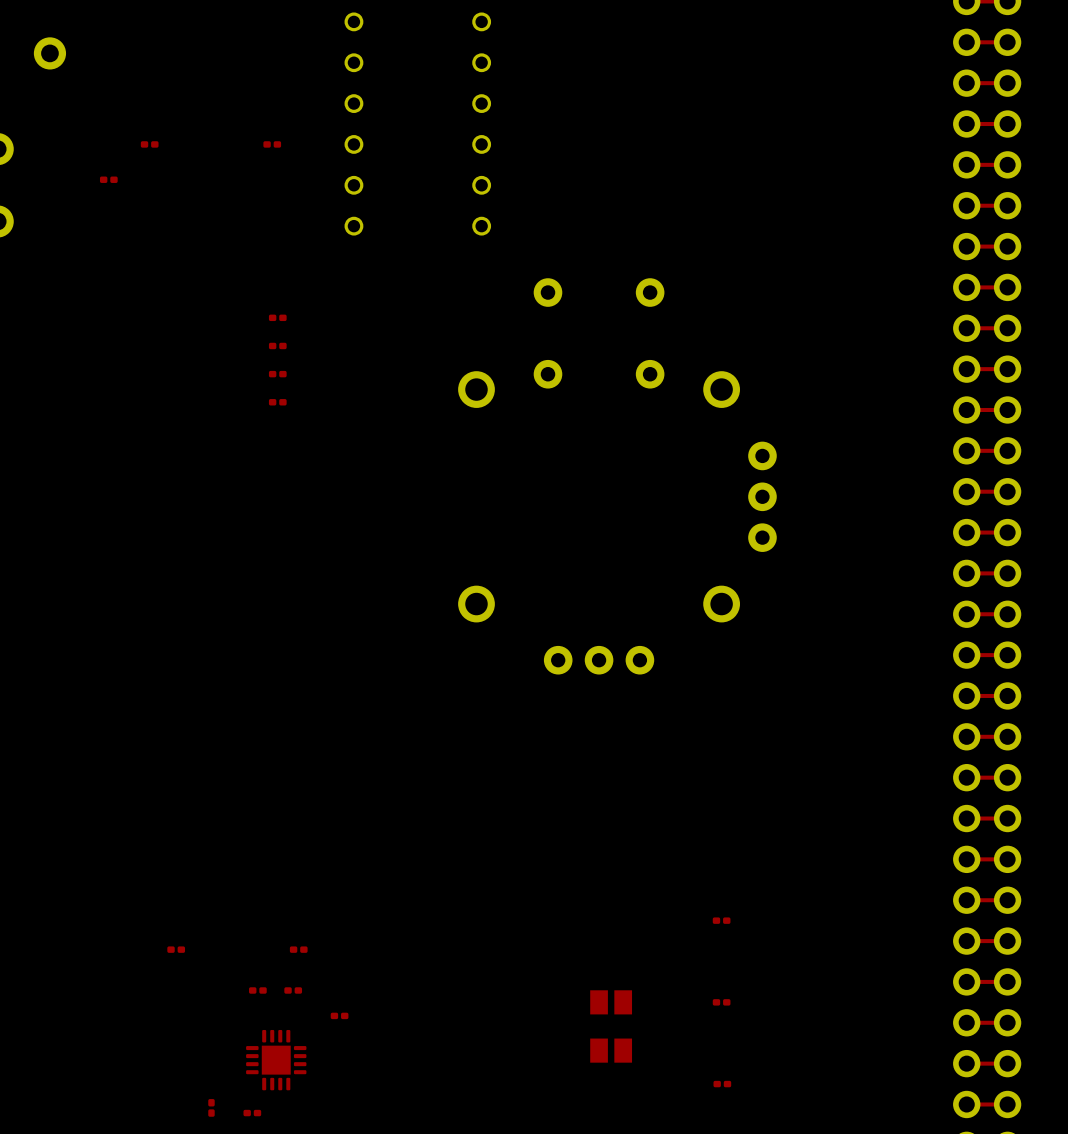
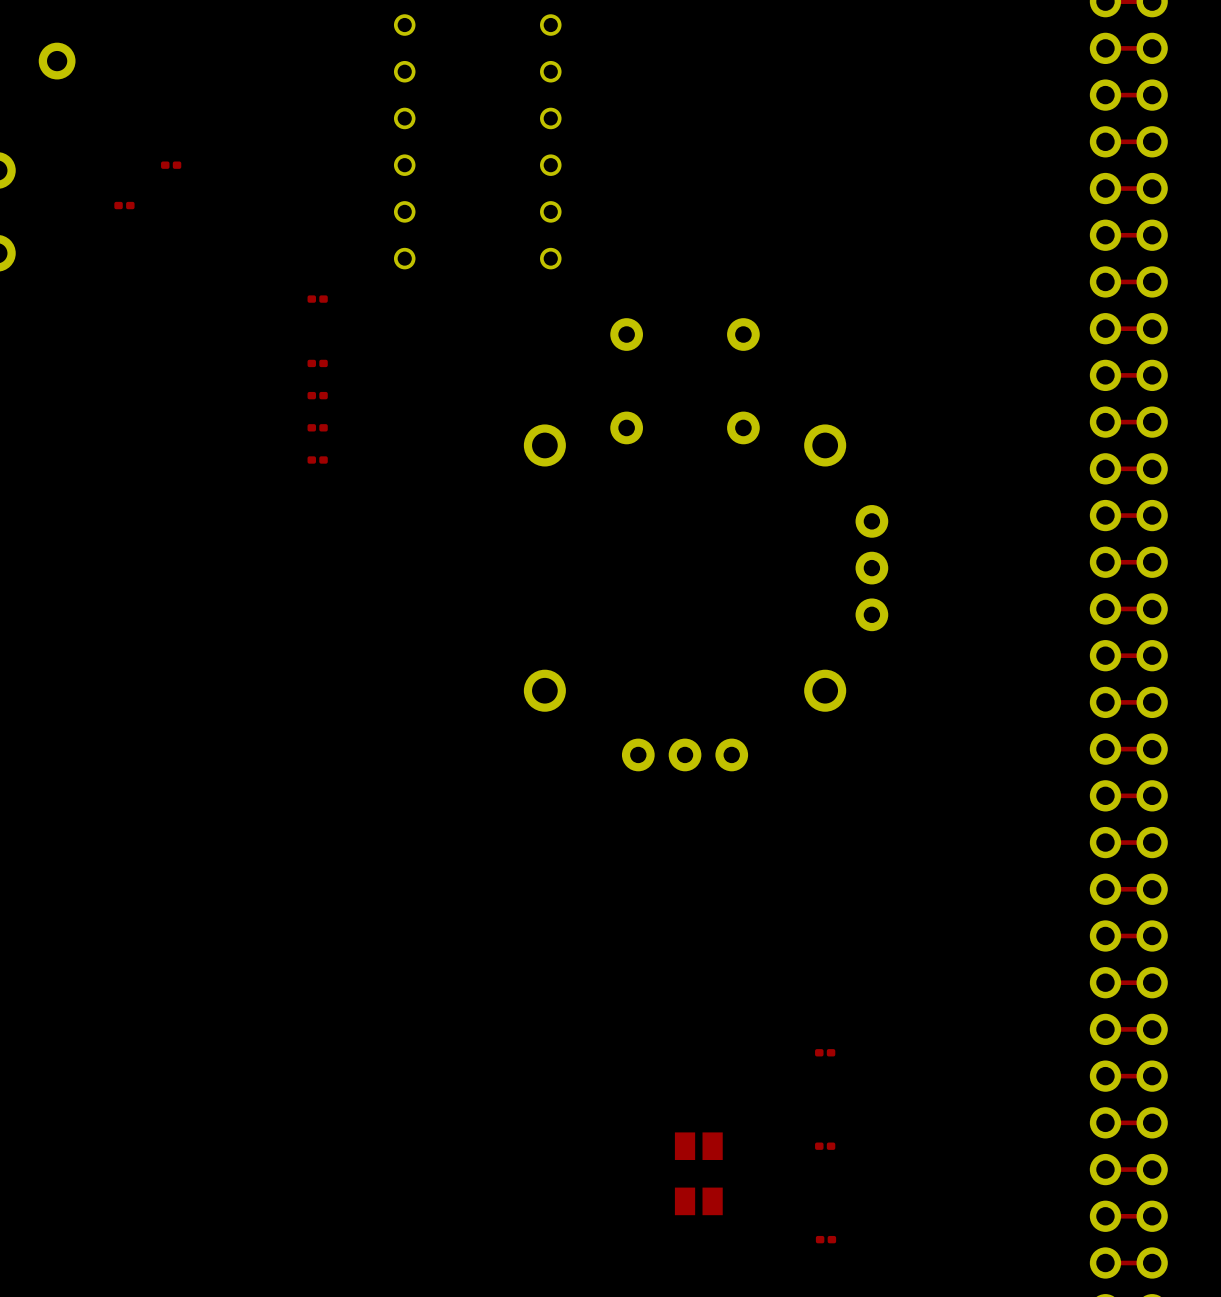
part position: (272, 144) -> (317, 299)
part: (176, 949) -> none
part: (298, 949) -> none
part: (257, 990) -> none
part: (293, 990) -> none
part: (339, 1015) -> none
part: (276, 1060) -> none
part: (211, 1107) -> none
part: (252, 1113) -> none

